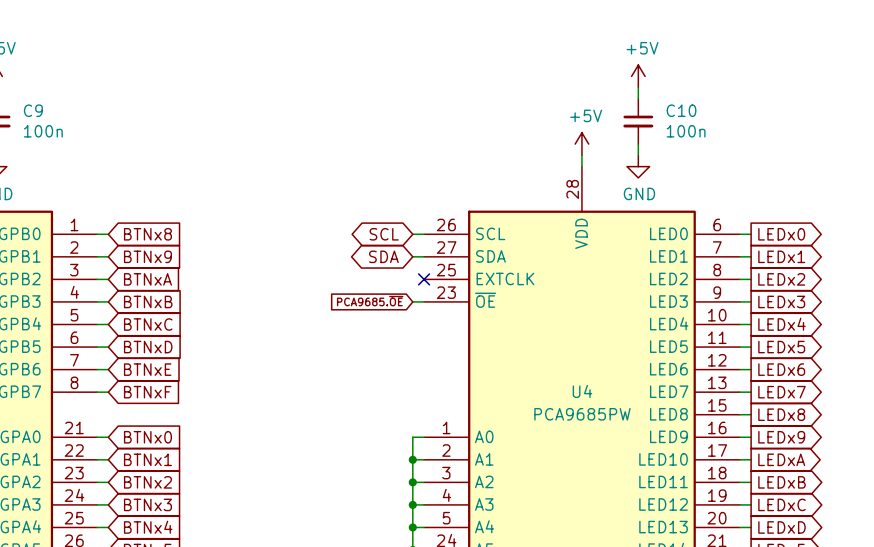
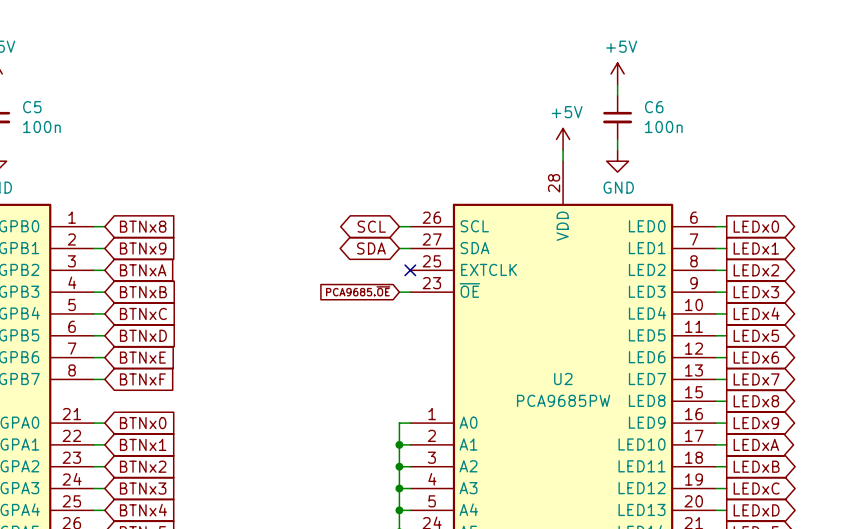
C9 name: C9 (33, 110) -> C5 (32, 107)
C10 name: C10 (681, 110) -> C6 (654, 107)
U4 name: U4 (582, 391) -> U2 (563, 379)

